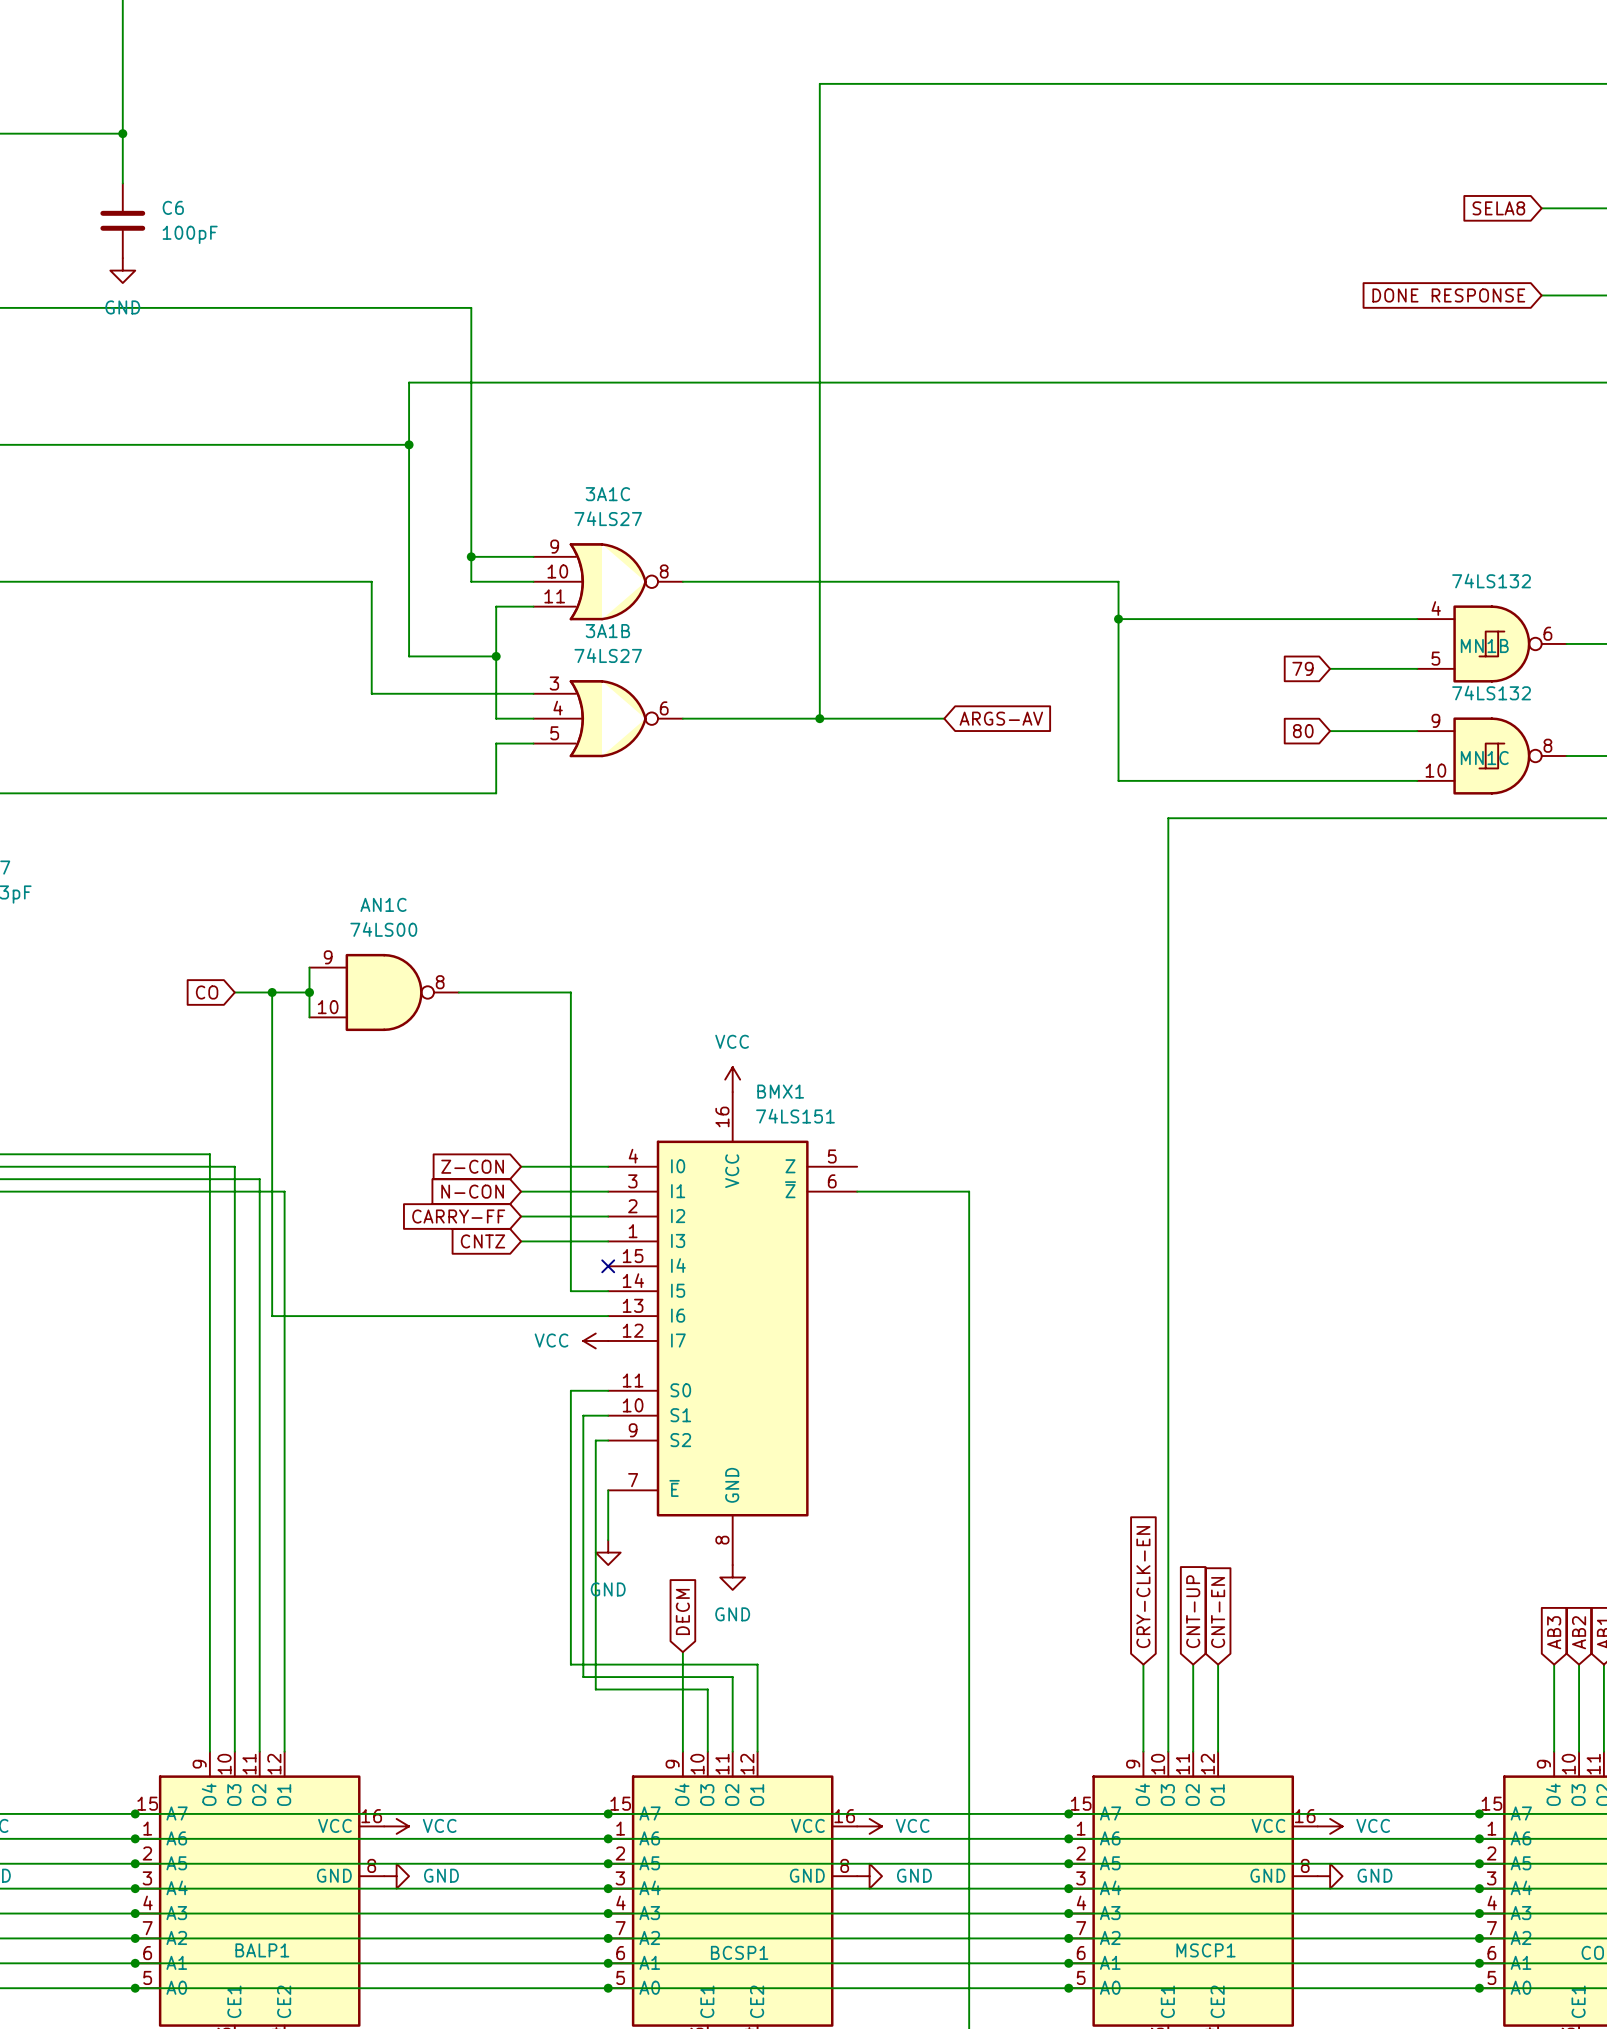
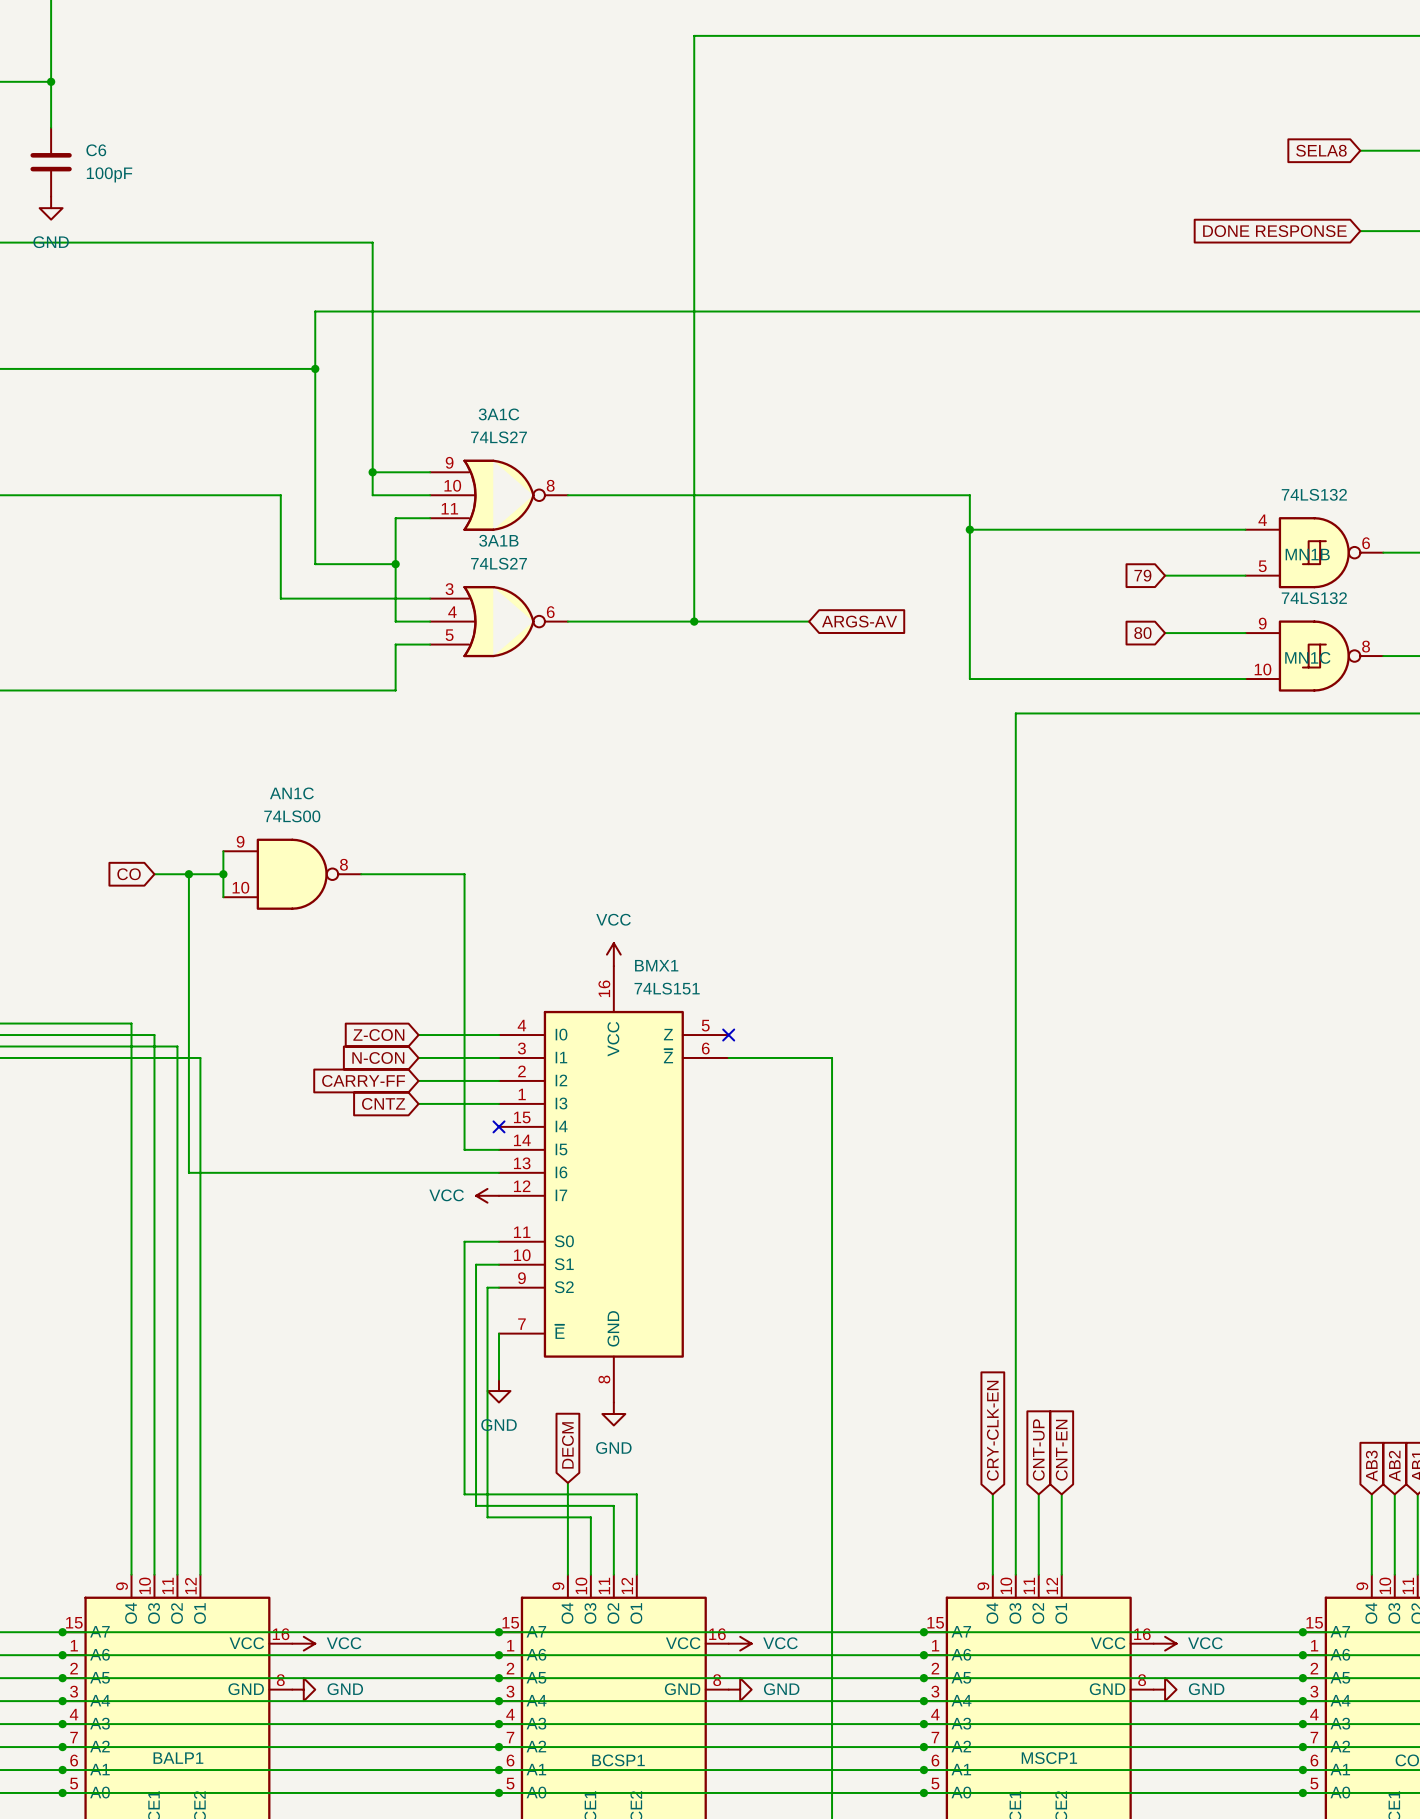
no-connect mark: none -> (728, 1035)

